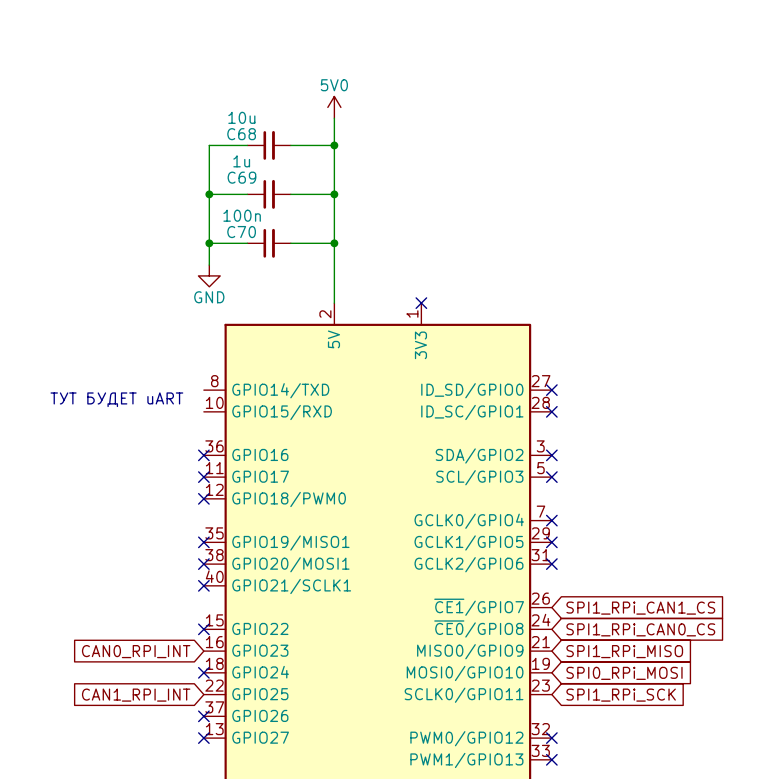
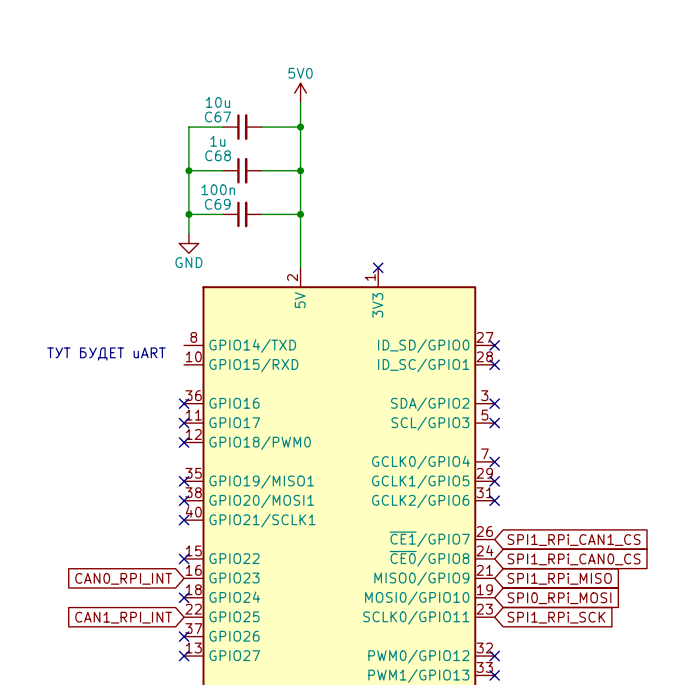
C68 name: C68 (241, 134) -> C67 (217, 116)
C69 name: C69 (241, 177) -> C68 (218, 155)
C70 name: C70 (241, 232) -> C69 (217, 204)

